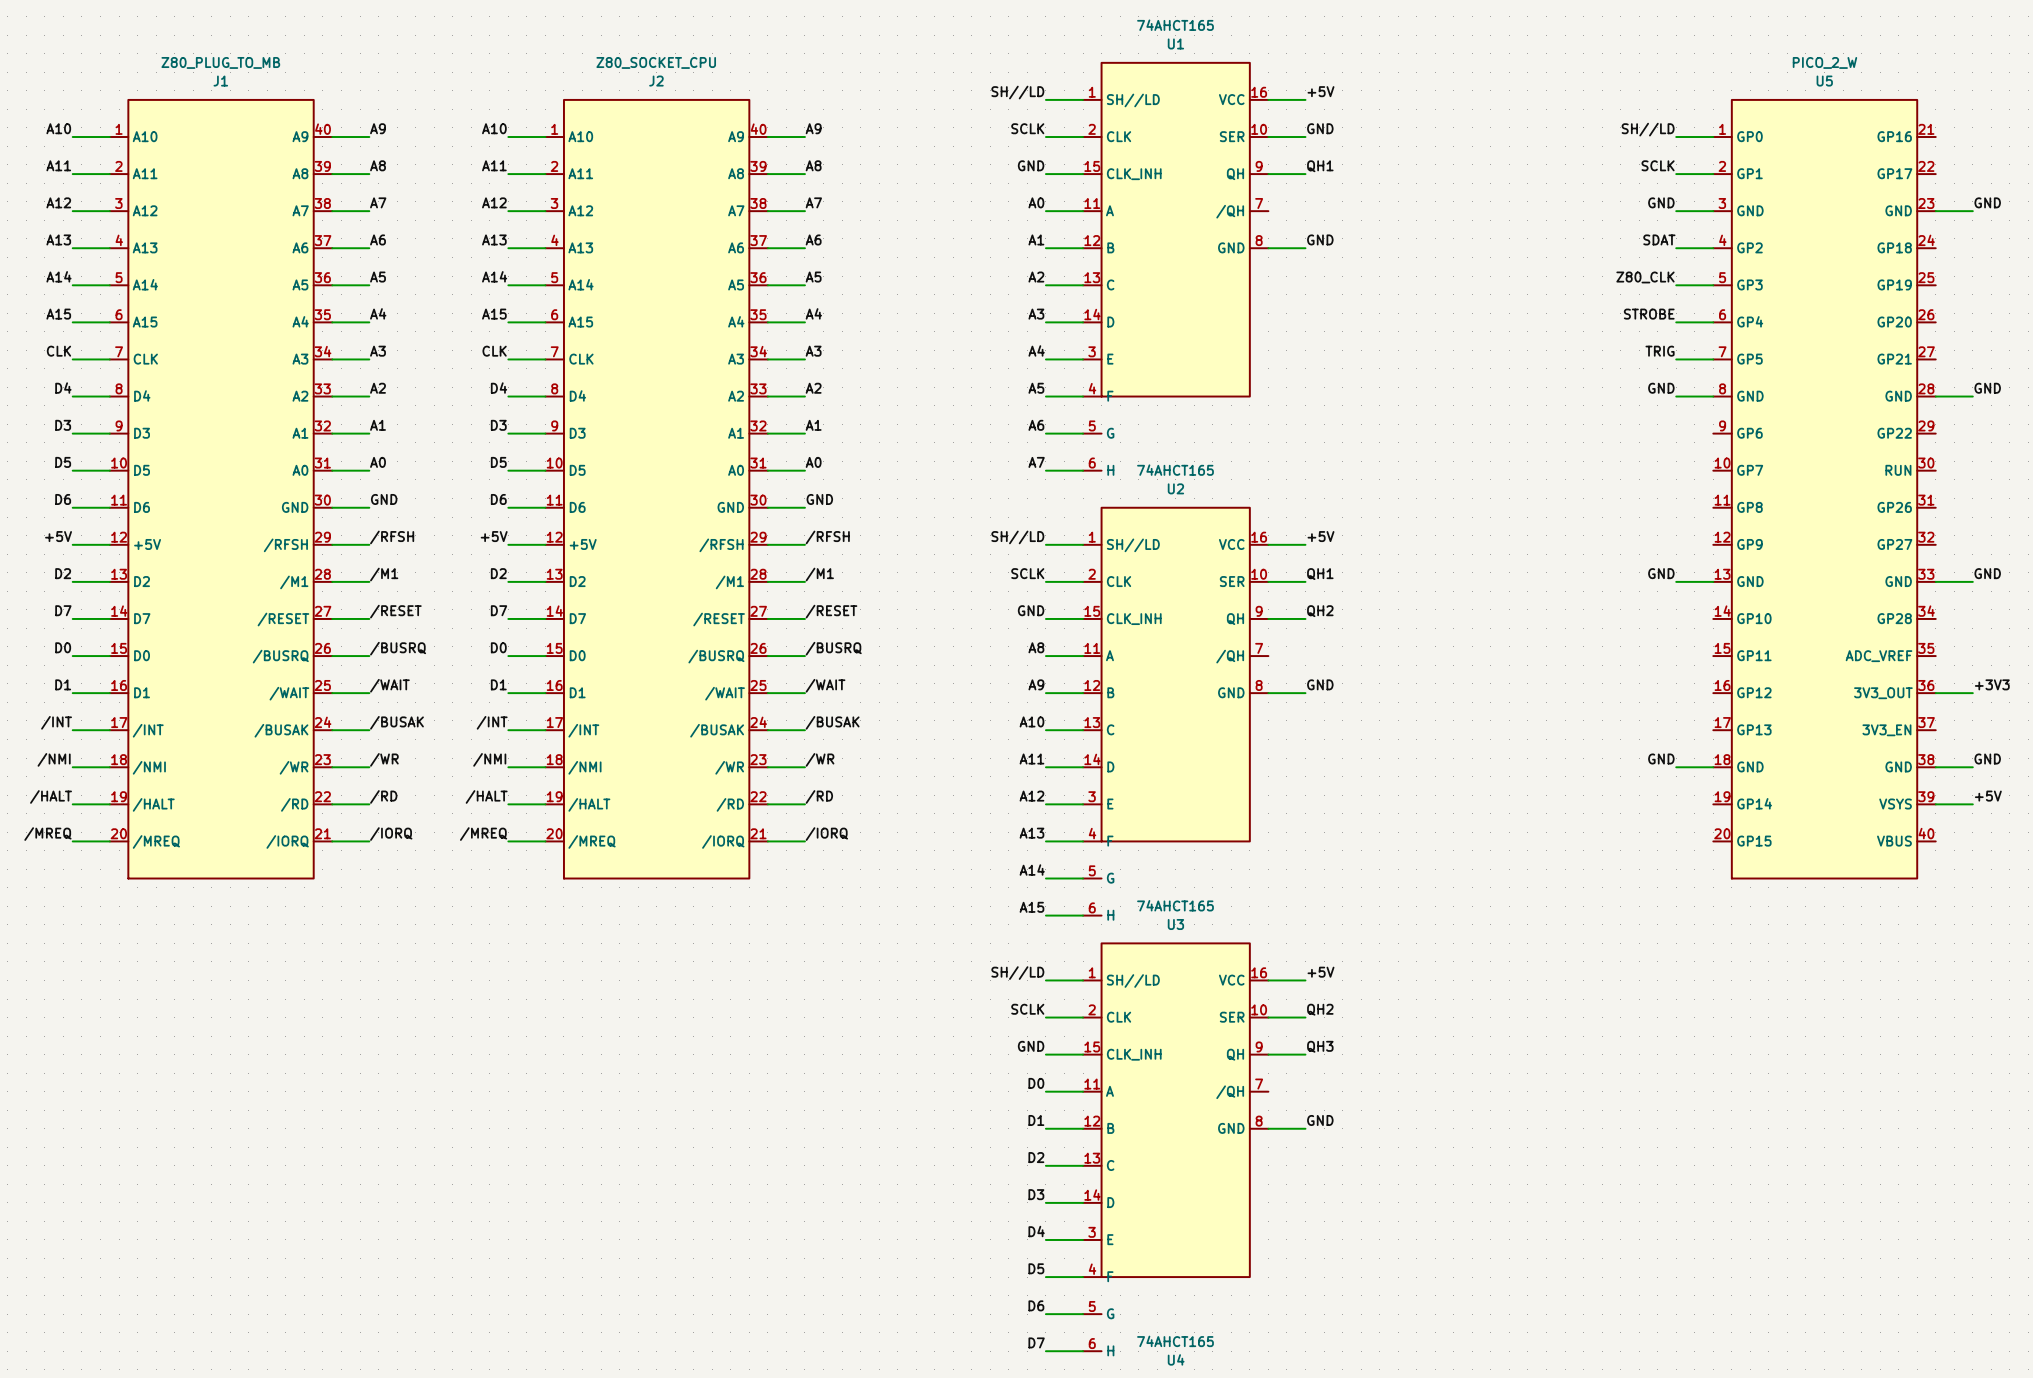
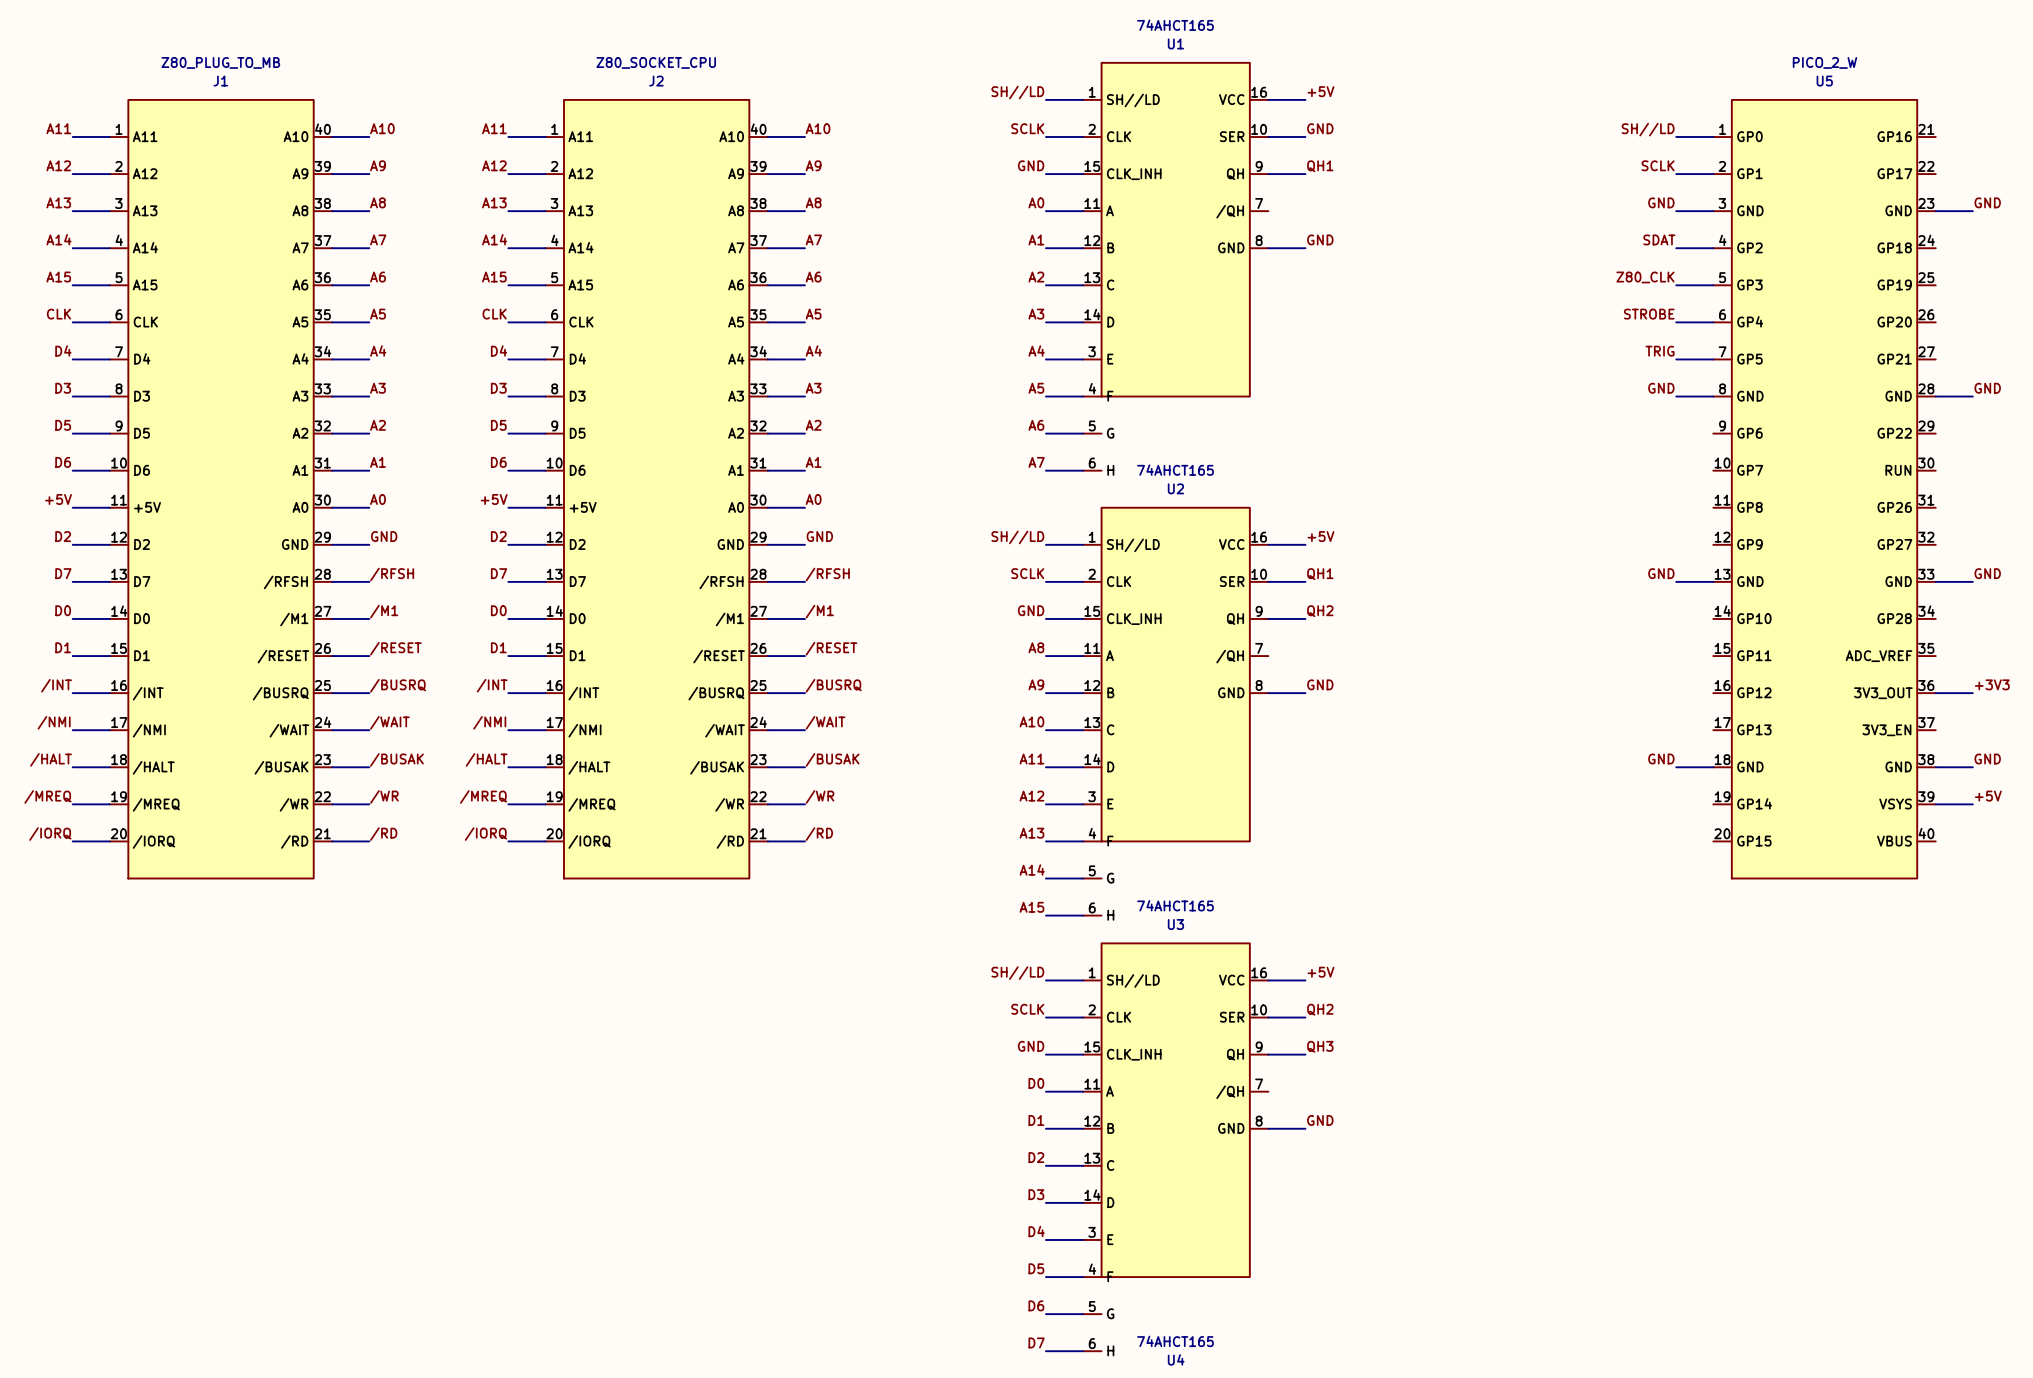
J1 symbol: [109, 99, 333, 880] -> [109, 99, 333, 880]
J2 symbol: [545, 99, 768, 880] -> [545, 99, 768, 880]
label: A10 (58, 128) -> A11 (58, 128)
label: A9 (378, 128) -> A10 (382, 128)
label: A10 (494, 128) -> A11 (494, 128)
label: A9 (813, 128) -> A10 (818, 128)
label: A11 (58, 165) -> A12 (58, 165)
label: A8 (378, 165) -> A9 (378, 165)
label: A11 (494, 165) -> A12 (494, 165)
label: A8 (813, 165) -> A9 (813, 165)
label: A12 (58, 202) -> A13 (58, 202)
label: A7 (378, 202) -> A8 (378, 202)
label: A12 (494, 202) -> A13 (494, 202)
label: A7 (813, 202) -> A8 (813, 202)
label: A13 (58, 239) -> A14 (58, 239)
label: A6 (378, 239) -> A7 (378, 239)
label: A13 (494, 239) -> A14 (494, 239)
label: A6 (813, 239) -> A7 (813, 239)
label: A14 (58, 276) -> A15 (58, 277)
label: A14 (494, 276) -> A15 (494, 277)
label: A5 (378, 277) -> A6 (378, 277)
label: A5 (813, 277) -> A6 (813, 277)
label: A4 (378, 313) -> A5 (378, 314)
label: A4 (813, 313) -> A5 (813, 314)
label: A15 (58, 314) -> CLK (58, 314)
label: A15 (494, 314) -> CLK (494, 314)
label: CLK (58, 351) -> D4 (63, 350)
label: A3 (378, 351) -> A4 (378, 350)
label: CLK (494, 351) -> D4 (499, 350)
label: A3 (813, 351) -> A4 (813, 350)
label: D4 (63, 388) -> D3 (63, 388)
label: A2 (378, 388) -> A3 (378, 388)
label: D4 (499, 388) -> D3 (498, 388)
label: A2 (813, 388) -> A3 (813, 388)
label: D3 (63, 425) -> D5 (63, 425)
label: A1 (378, 425) -> A2 (378, 425)
label: D3 (498, 425) -> D5 (498, 425)
label: A1 (813, 425) -> A2 (813, 425)
label: D5 (63, 462) -> D6 (63, 462)
label: A0 (378, 462) -> A1 (378, 462)
label: D5 (498, 462) -> D6 (498, 462)
label: A0 (813, 462) -> A1 (813, 462)
label: D6 (63, 499) -> +5V (58, 499)
label: GND (384, 499) -> A0 (378, 499)
label: D6 (498, 499) -> +5V (494, 499)
label: GND (819, 499) -> A0 (813, 499)
label: +5V (58, 536) -> D2 (63, 536)
label: +5V (494, 536) -> D2 (498, 536)
label: /RFSH (392, 537) -> GND (384, 536)
label: /RFSH (827, 537) -> GND (819, 536)
label: D2 (63, 573) -> D7 (63, 573)
label: D2 (498, 573) -> D7 (499, 573)
label: /M1 (384, 574) -> /RFSH (392, 574)
label: /M1 (819, 574) -> /RFSH (827, 574)
label: D7 (63, 610) -> D0 (63, 610)
label: D7 (499, 610) -> D0 (498, 610)
label: /RESET (395, 611) -> /M1 (384, 611)
label: /RESET (831, 611) -> /M1 (819, 611)
label: D0 (63, 647) -> D1 (63, 647)
label: D0 (498, 647) -> D1 (498, 647)
label: /BUSRQ (398, 648) -> /RESET (395, 648)
label: /BUSRQ (833, 648) -> /RESET (831, 648)
label: D1 (63, 684) -> /INT (56, 685)
label: D1 (498, 684) -> /INT (492, 685)
label: /WAIT (389, 685) -> /BUSRQ (398, 685)
label: /WAIT (825, 685) -> /BUSRQ (833, 685)
label: /INT (56, 722) -> /NMI (54, 722)
label: /BUSAK (396, 722) -> /WAIT (389, 722)
label: /INT (492, 722) -> /NMI (489, 722)
label: /BUSAK (832, 722) -> /WAIT (825, 722)
label: /NMI (54, 759) -> /HALT (51, 759)
label: /WR (384, 759) -> /BUSAK (396, 759)
label: /NMI (489, 759) -> /HALT (486, 759)
label: /WR (820, 759) -> /BUSAK (832, 759)
label: /HALT (51, 796) -> /MREQ (47, 796)
label: /RD (383, 796) -> /WR (384, 796)
label: /HALT (486, 796) -> /MREQ (483, 796)
label: /RD (819, 796) -> /WR (820, 796)
label: /MREQ (47, 834) -> /IORQ (50, 834)
label: /IORQ (391, 834) -> /RD (383, 834)
label: /MREQ (483, 834) -> /IORQ (485, 834)
label: /IORQ (826, 834) -> /RD (819, 834)

